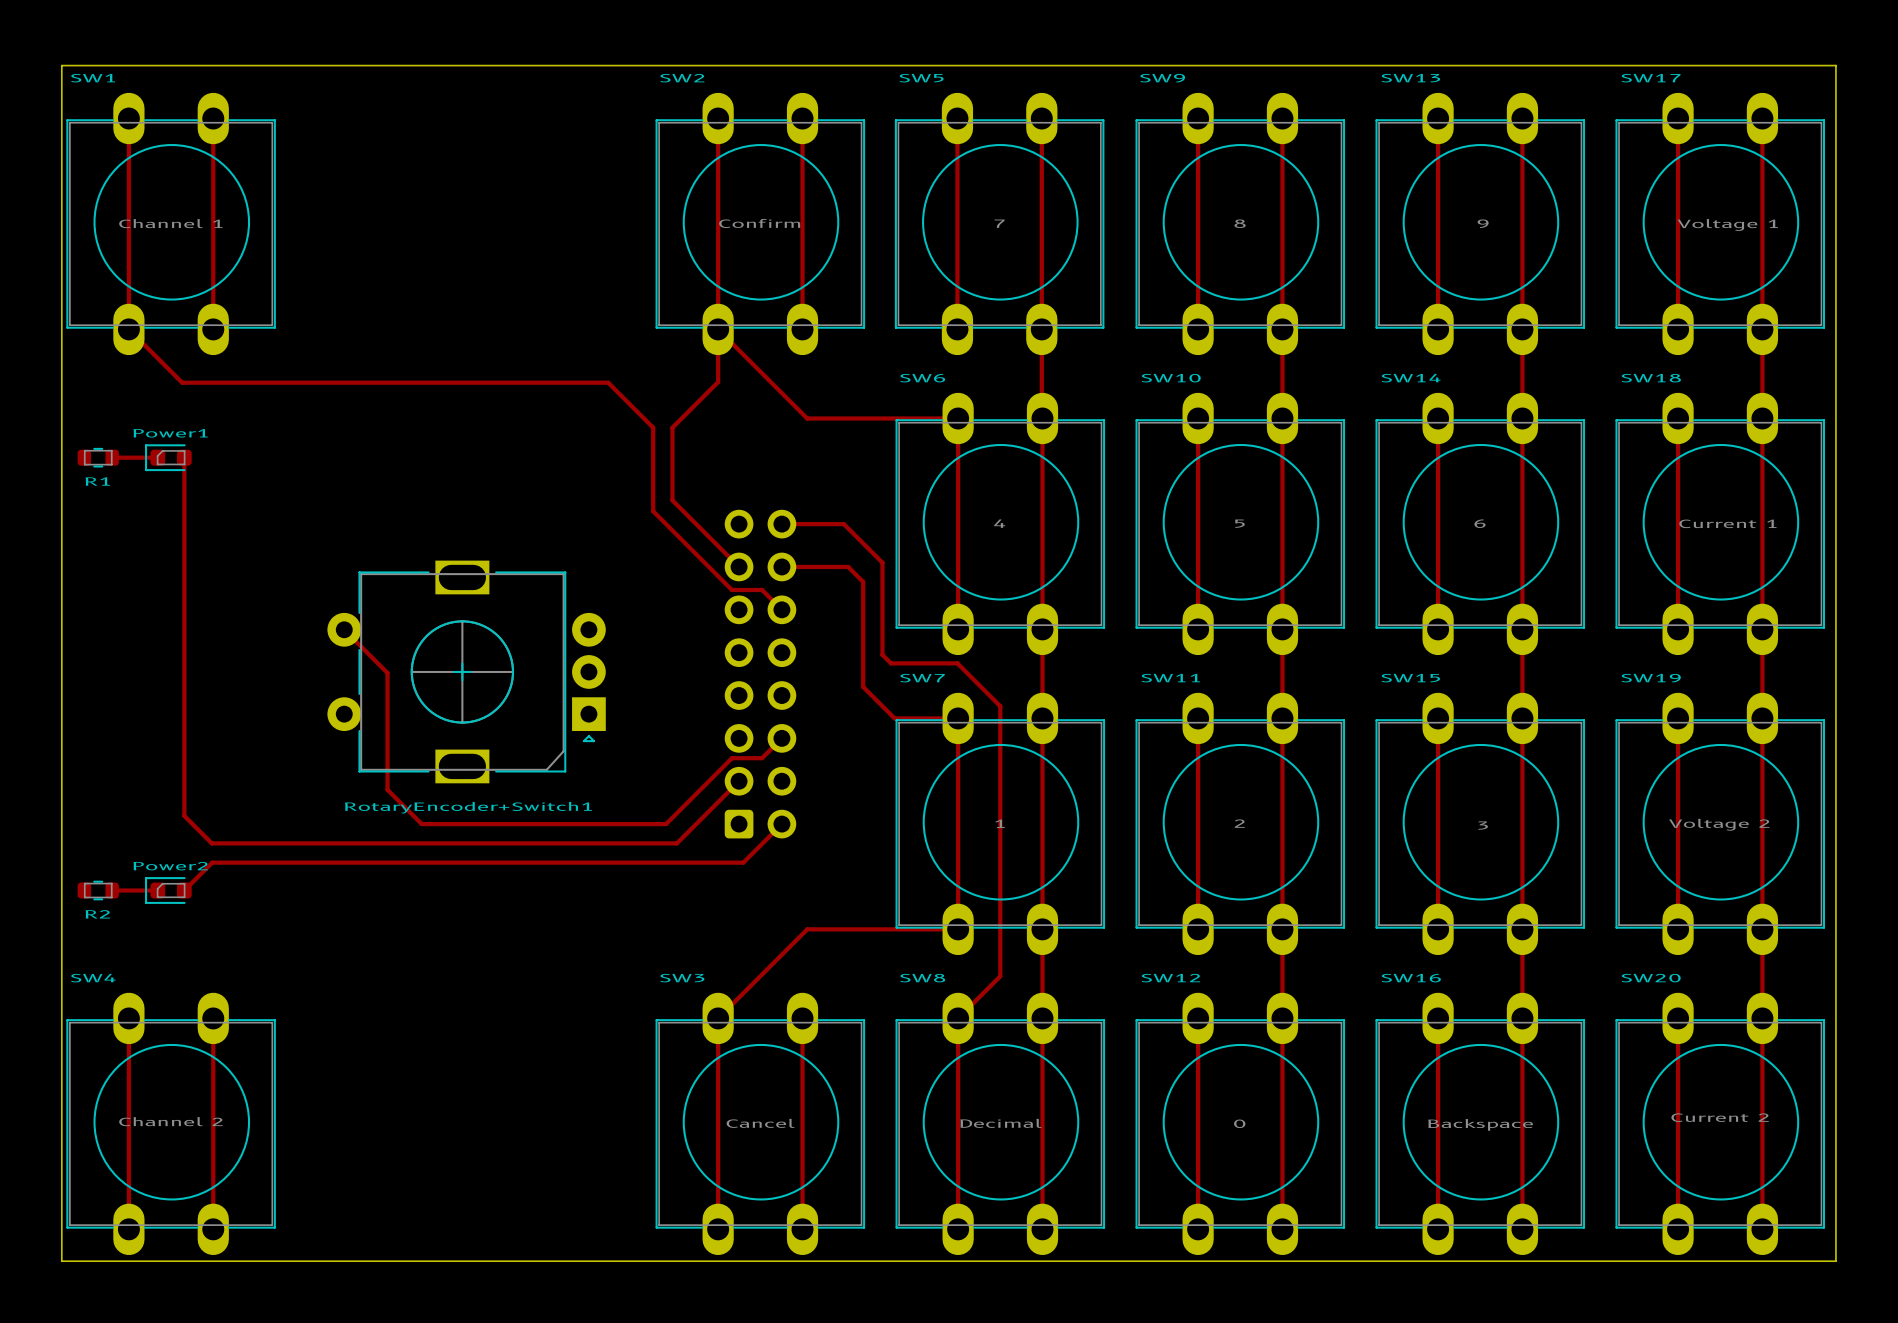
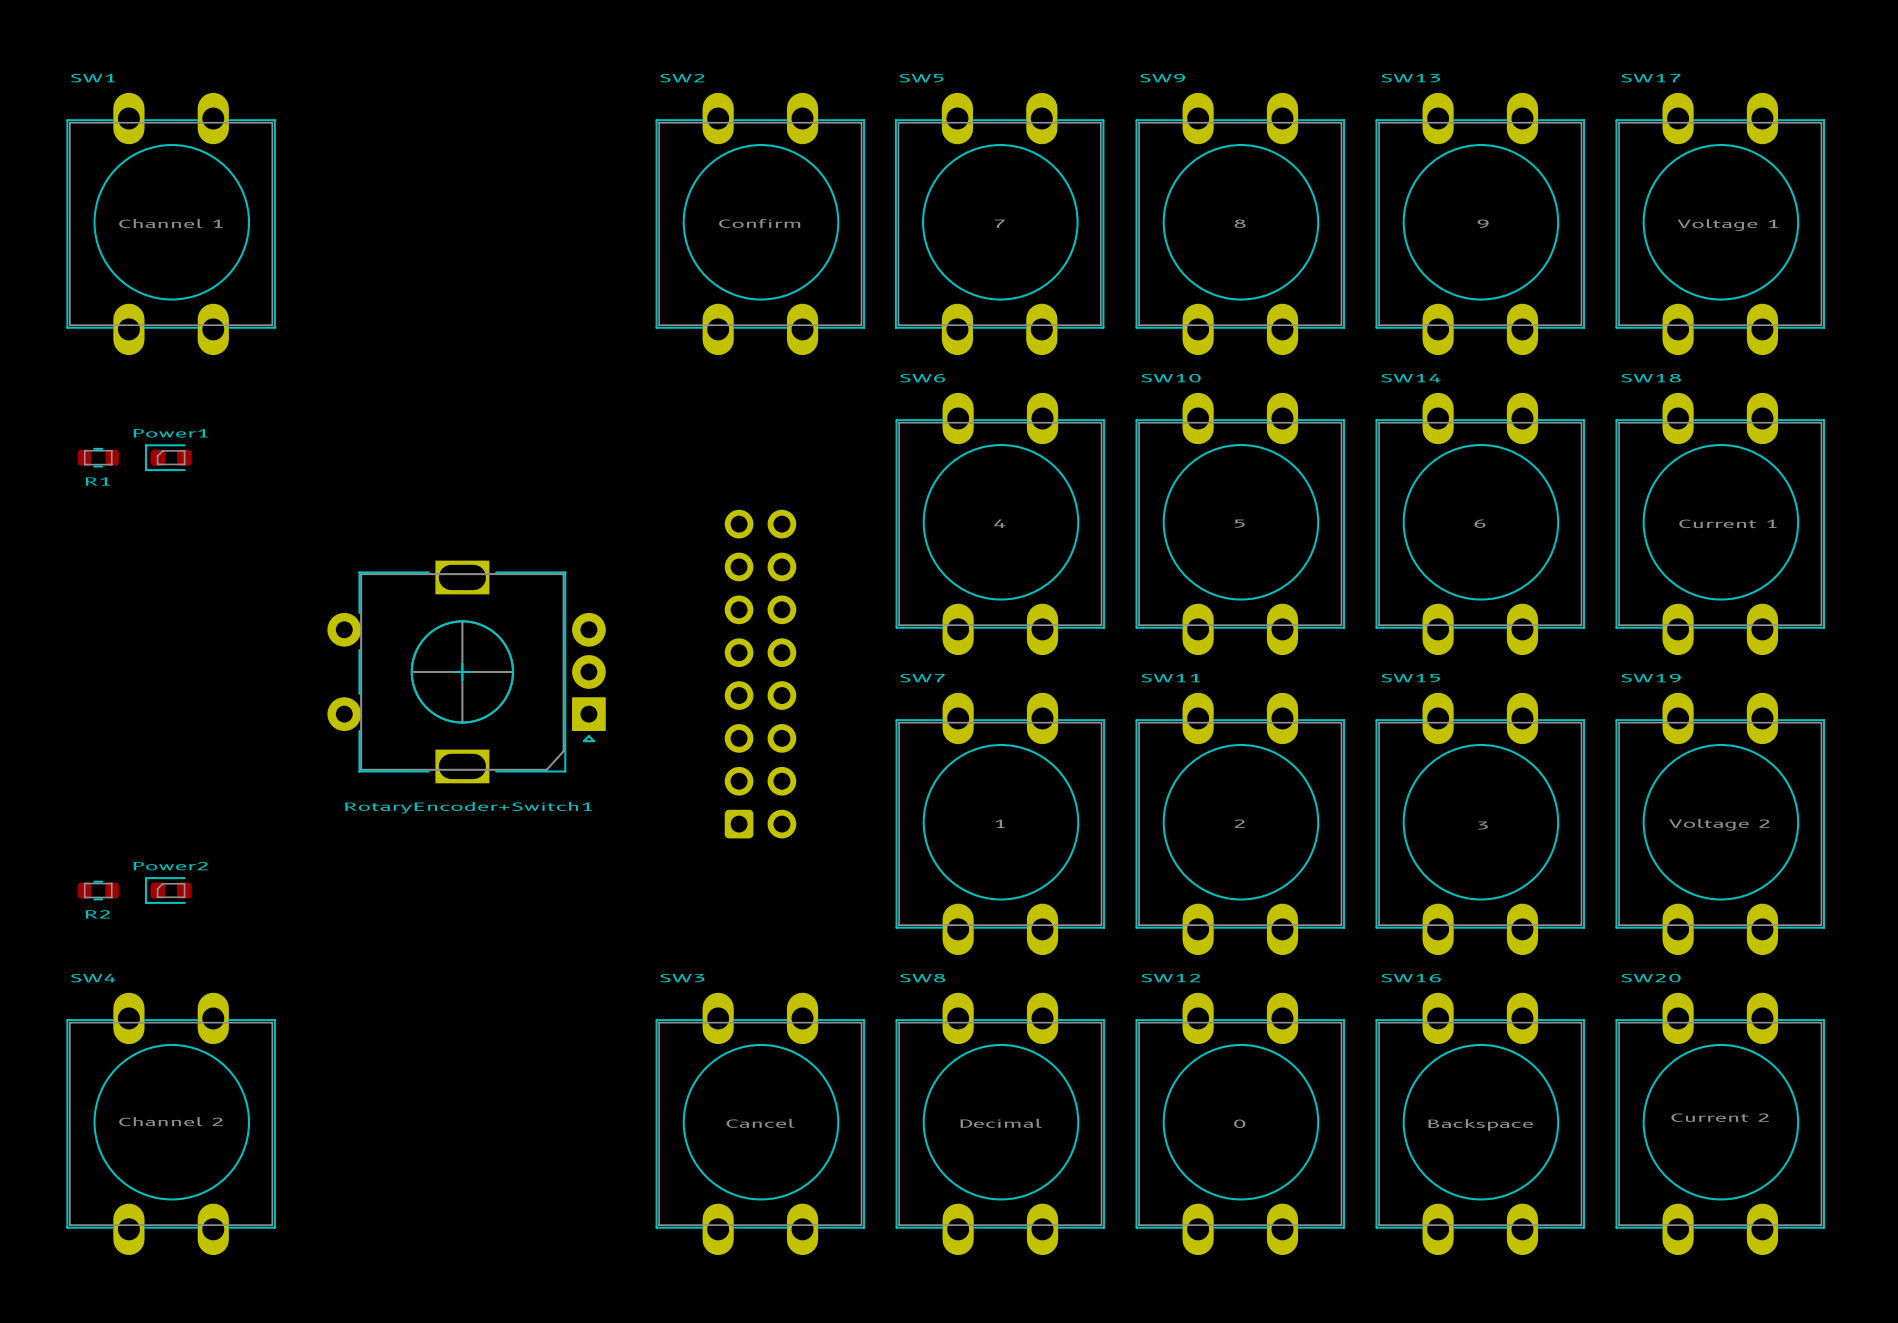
board edge: (61, 65) (1835, 65) (1835, 1261) (61, 1261) (61, 65) -> none
track: (128, 118) (128, 329) (182, 382) (608, 382) (653, 427) (653, 511) (731, 590) (762, 590) (781, 609) -> none
track: (213, 118) (213, 329) -> none
track: (718, 118) (718, 382) (672, 427) (672, 500) (739, 566) -> none
track: (802, 118) (802, 329) -> none
track: (957, 118) (957, 329) -> none
track: (1041, 118) (1042, 1229) -> none
track: (1198, 118) (1198, 329) -> none
track: (1282, 118) (1282, 1018) -> none
track: (1438, 118) (1438, 329) -> none
track: (1522, 118) (1522, 1229) -> none
track: (1678, 118) (1678, 329) -> none
track: (1762, 118) (1762, 1229) -> none
track: (718, 329) (807, 418) (958, 418) (958, 629) -> none
track: (1198, 418) (1198, 629) -> none
track: (1438, 418) (1438, 629) -> none
track: (1678, 418) (1678, 629) -> none
track: (112, 457) (157, 457) -> none
track: (184, 457) (184, 815) (211, 843) (676, 843) (739, 781) -> none
track: (781, 524) (843, 524) (882, 562) (882, 654) (891, 663) (957, 663) (1000, 706) (1000, 976) (958, 1018) (958, 1229) -> none
track: (781, 566) (848, 566) (863, 581) (863, 686) (894, 718) (958, 718) (958, 929) (807, 929) (718, 1018) -> none
track: (344, 629) (387, 673) (387, 789) (421, 824) (666, 824) (731, 758) (762, 758) (781, 738) -> none
track: (1198, 718) (1198, 929) -> none
track: (1438, 718) (1438, 929) -> none
track: (1678, 718) (1678, 929) -> none
track: (781, 824) (743, 862) (212, 862) (184, 890) -> none
track: (112, 890) (157, 890) -> none
track: (128, 1018) (128, 1229) -> none
track: (213, 1018) (213, 1229) -> none
track: (802, 1018) (802, 1229) -> none
track: (1438, 1018) (1438, 1229) -> none
track: (1678, 1018) (1678, 1229) -> none
track: (718, 1022) (718, 1233) -> none
track: (1198, 1022) (1198, 1233) -> none
track: (1282, 1022) (1282, 1233) -> none

